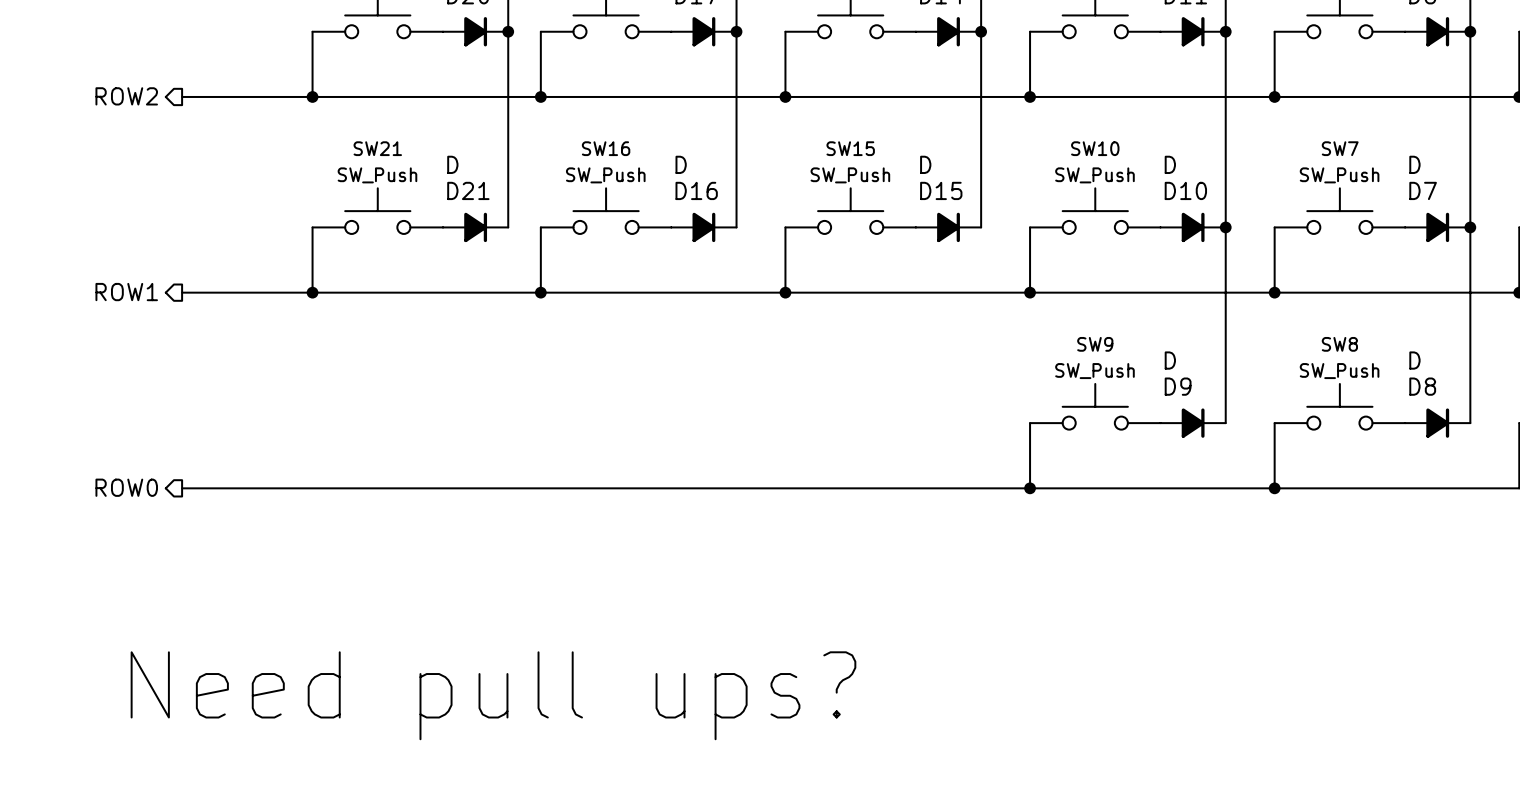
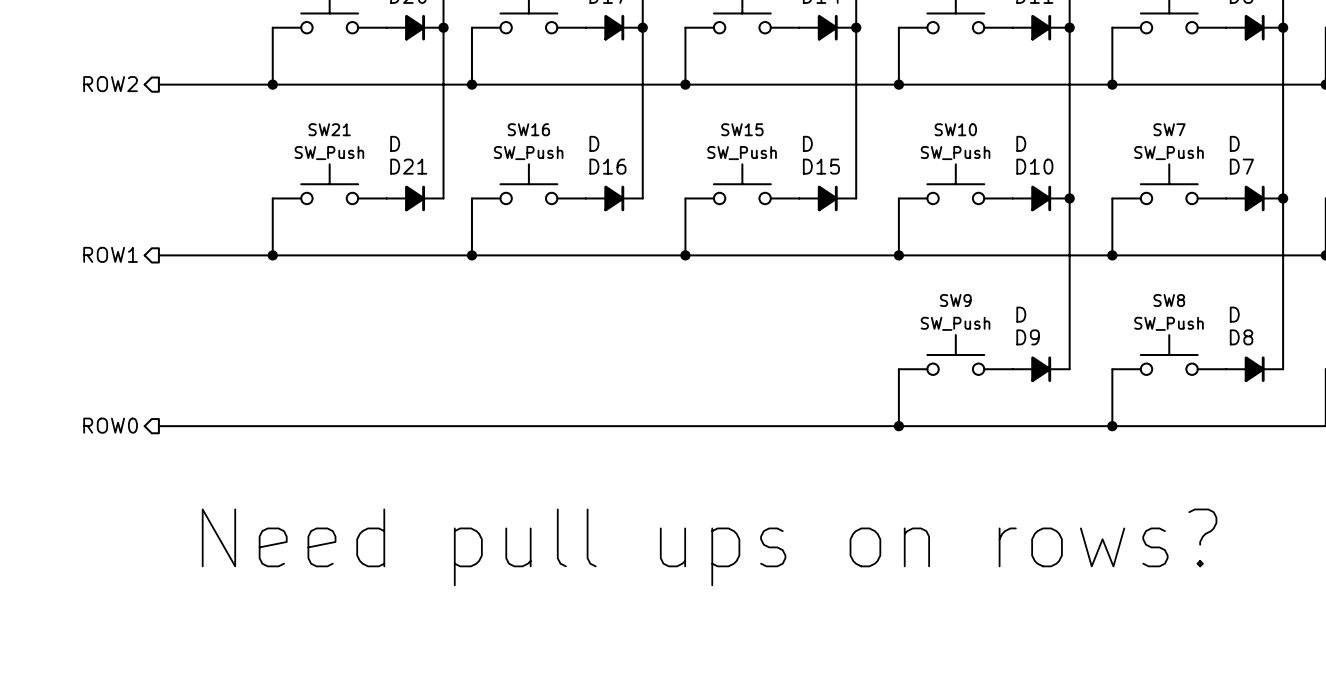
text: none -> Need pull ups on rows? (709, 547)
text: Need pull ups? (493, 695) -> none

